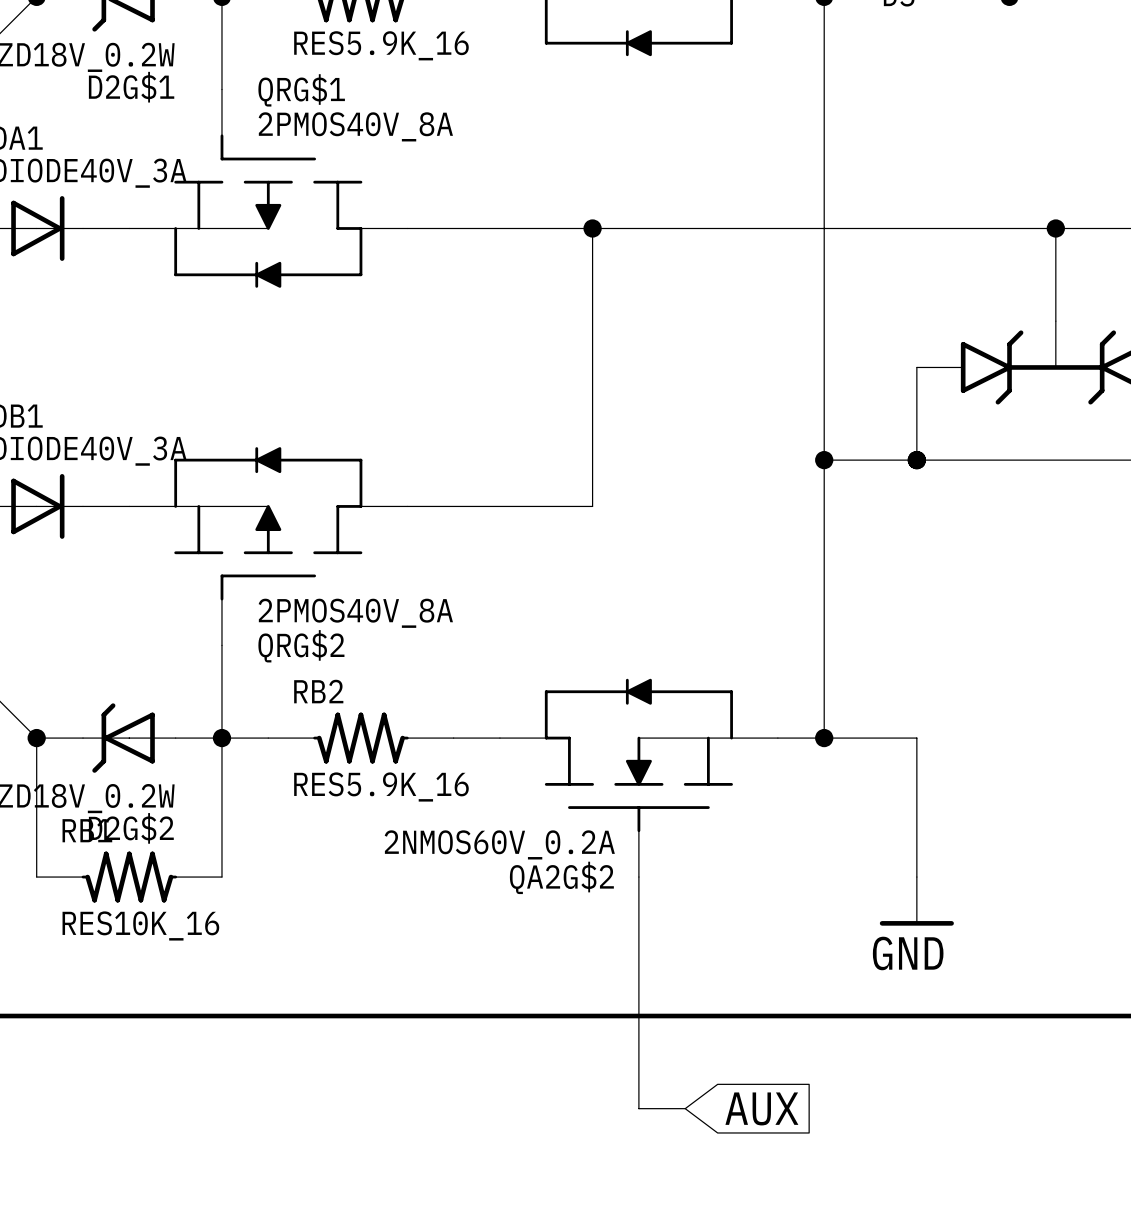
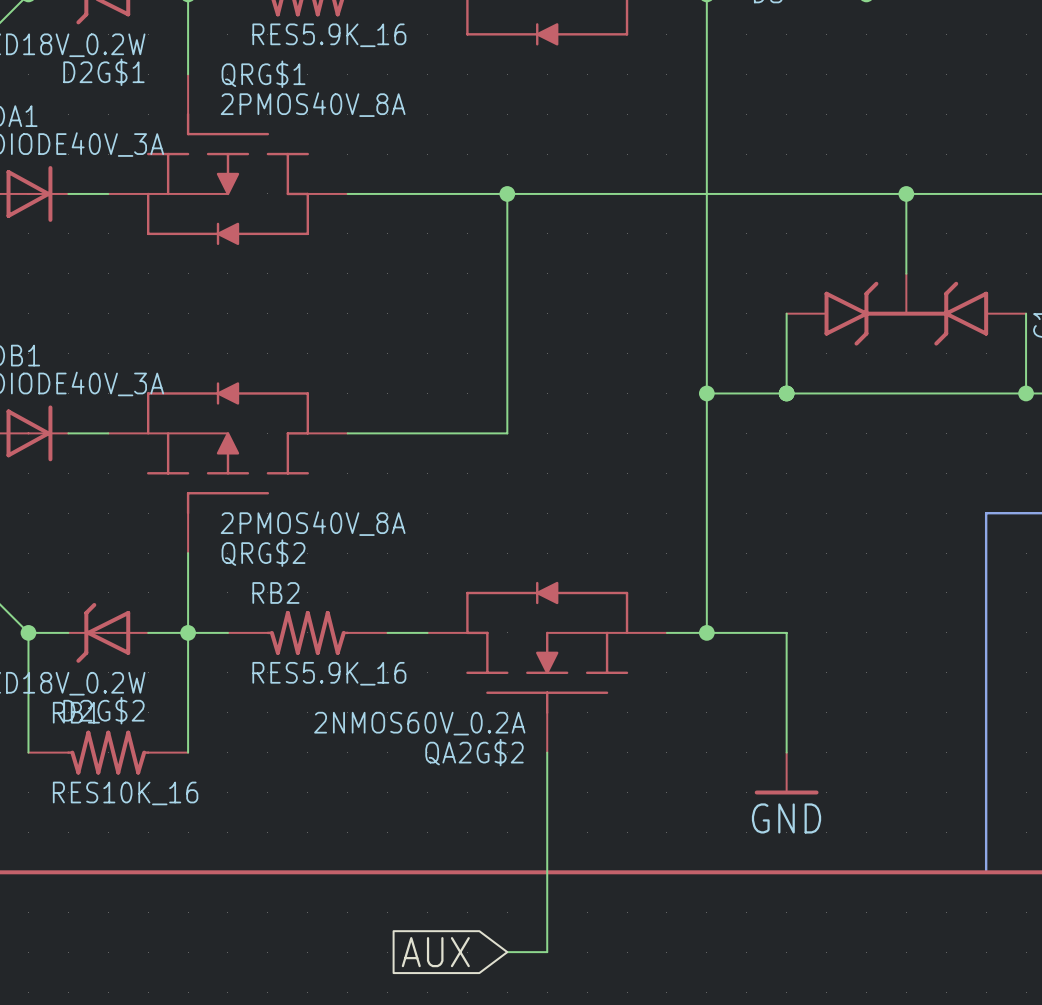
wire: (638, 1108) (685, 1108) -> (547, 952) (507, 952)
global label rotation: 0° (761, 1108) -> 180° (435, 952)
global label position: AUX (761, 1108) -> AUX (435, 952)

